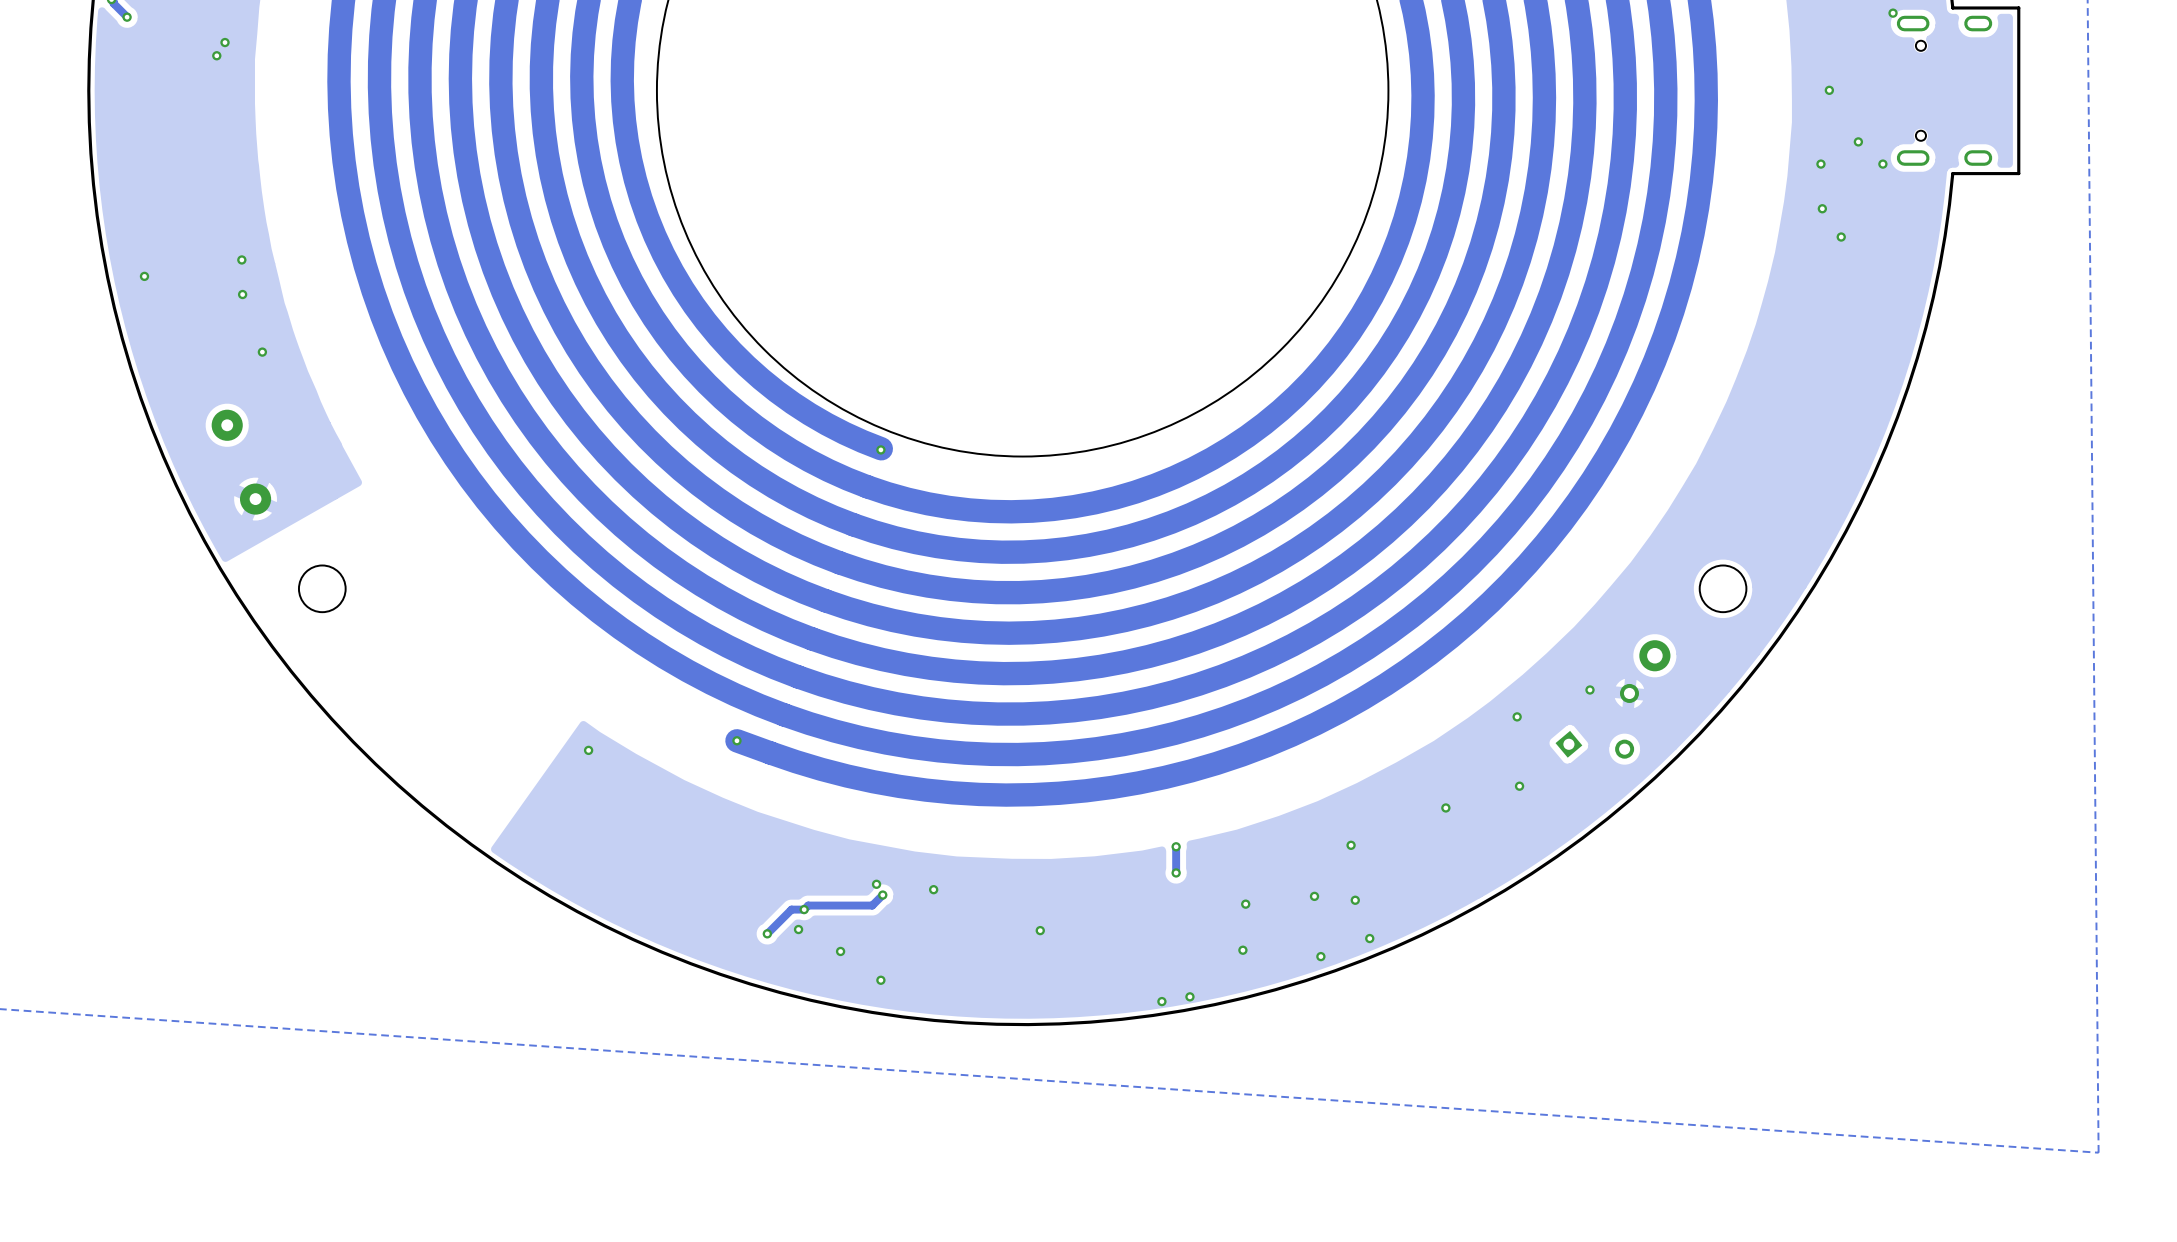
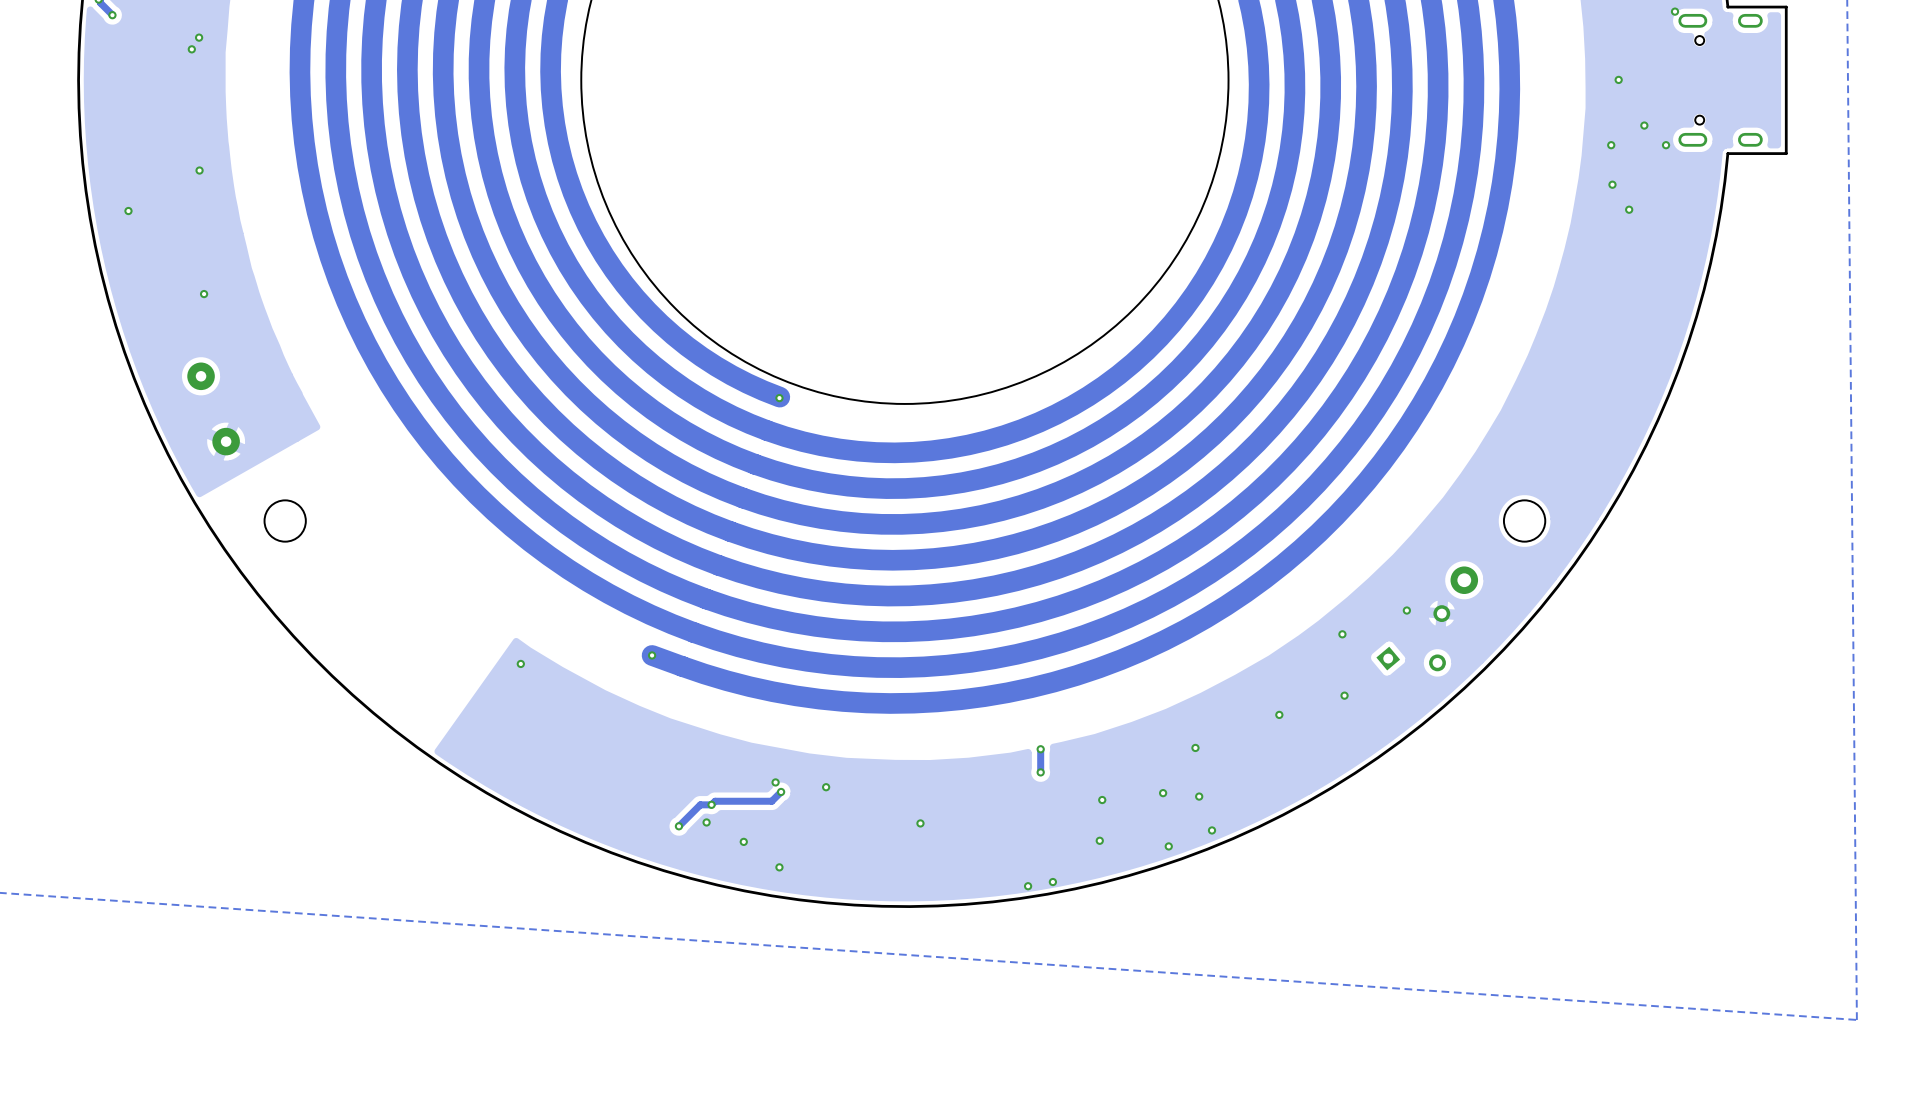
via: none -> (199, 170)
via: (241, 259) -> none
via position: (144, 276) -> (128, 211)
via: (242, 294) -> none
via: none -> (204, 294)
via: (262, 352) -> none

